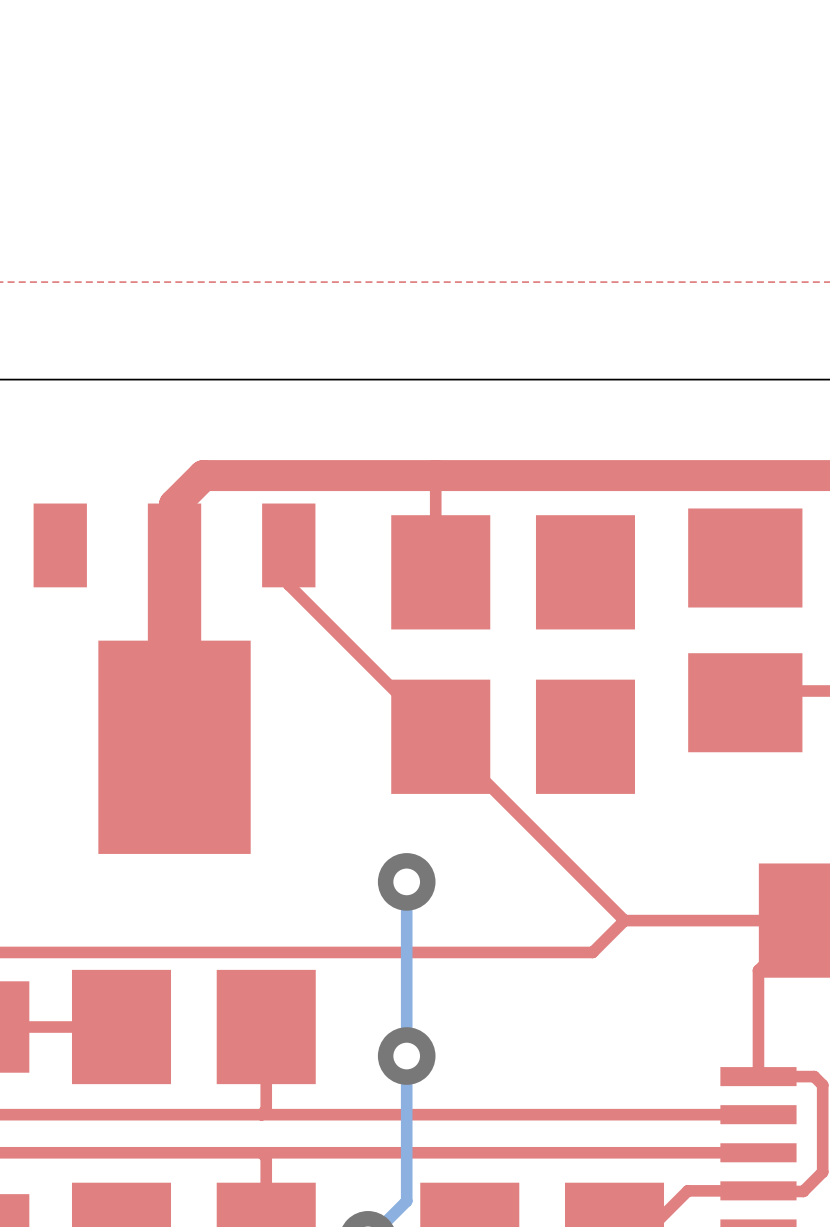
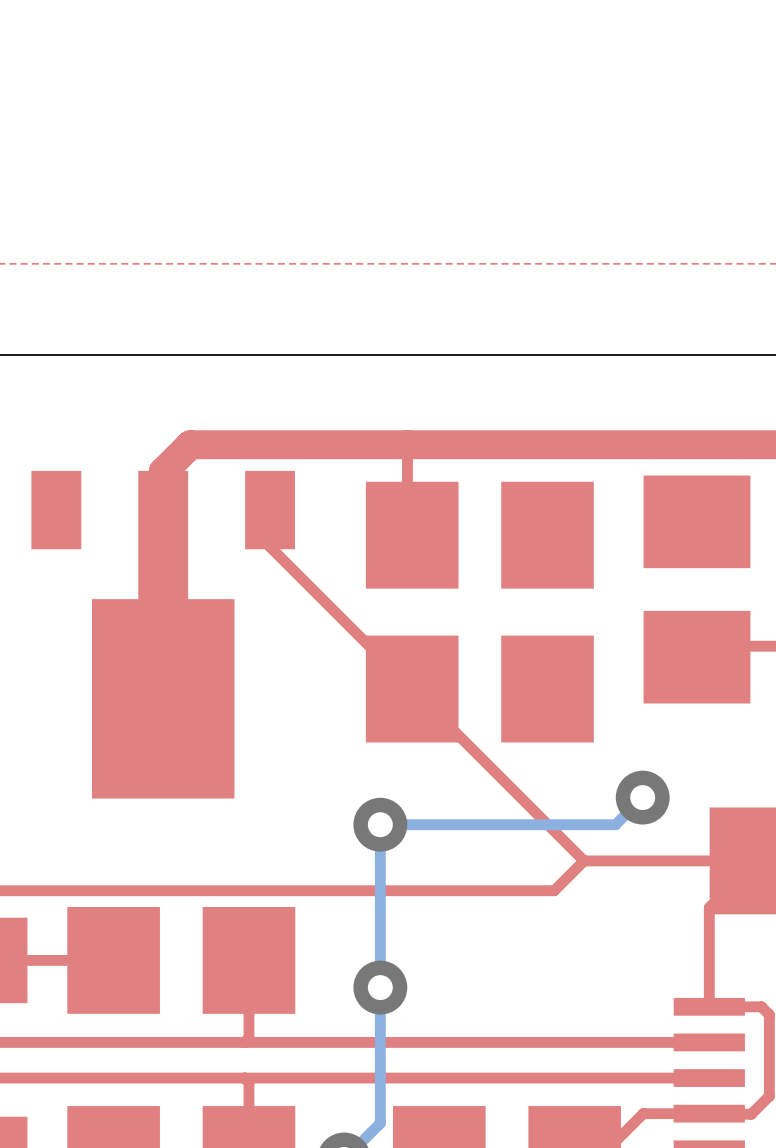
bottom track: none -> (642, 797) (615, 824) (380, 824)
via: none -> (642, 797)

